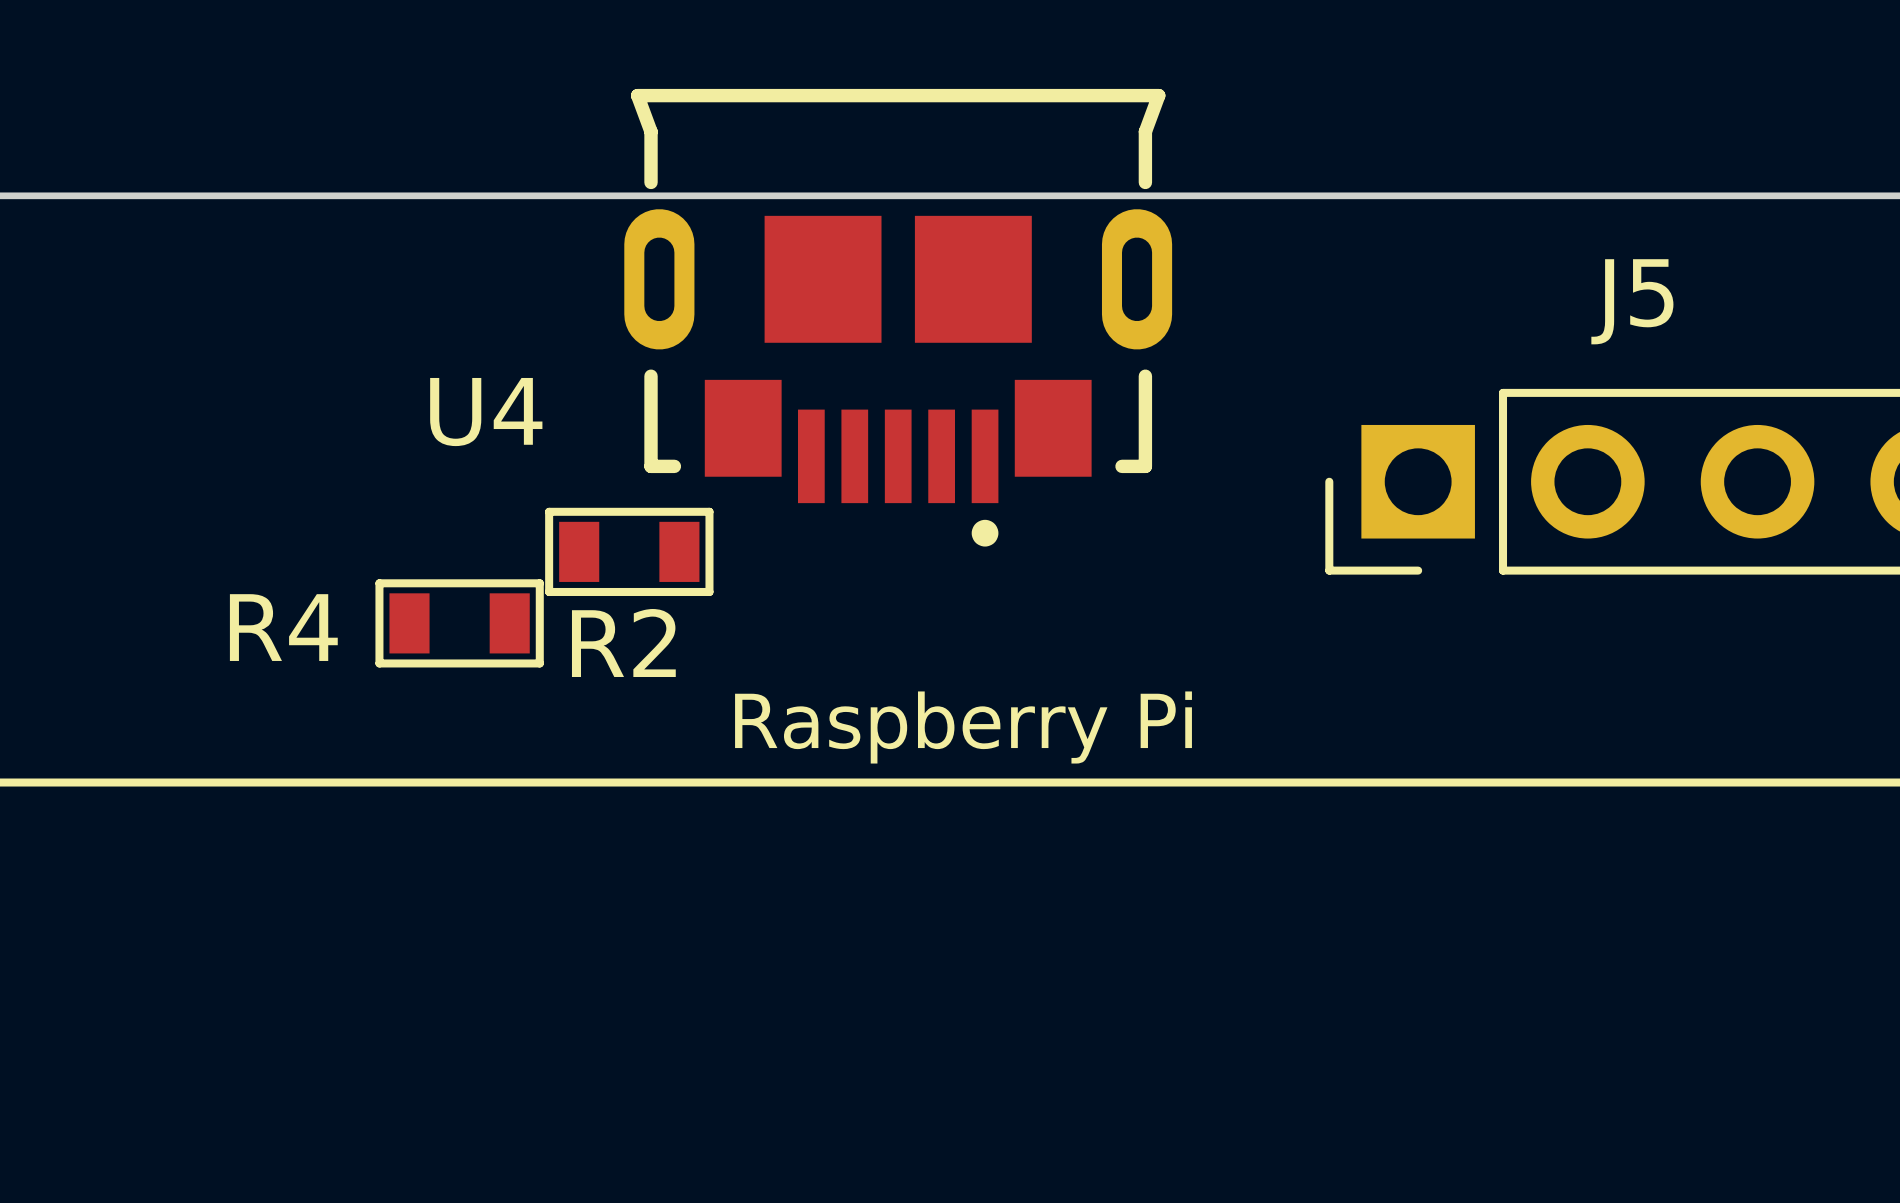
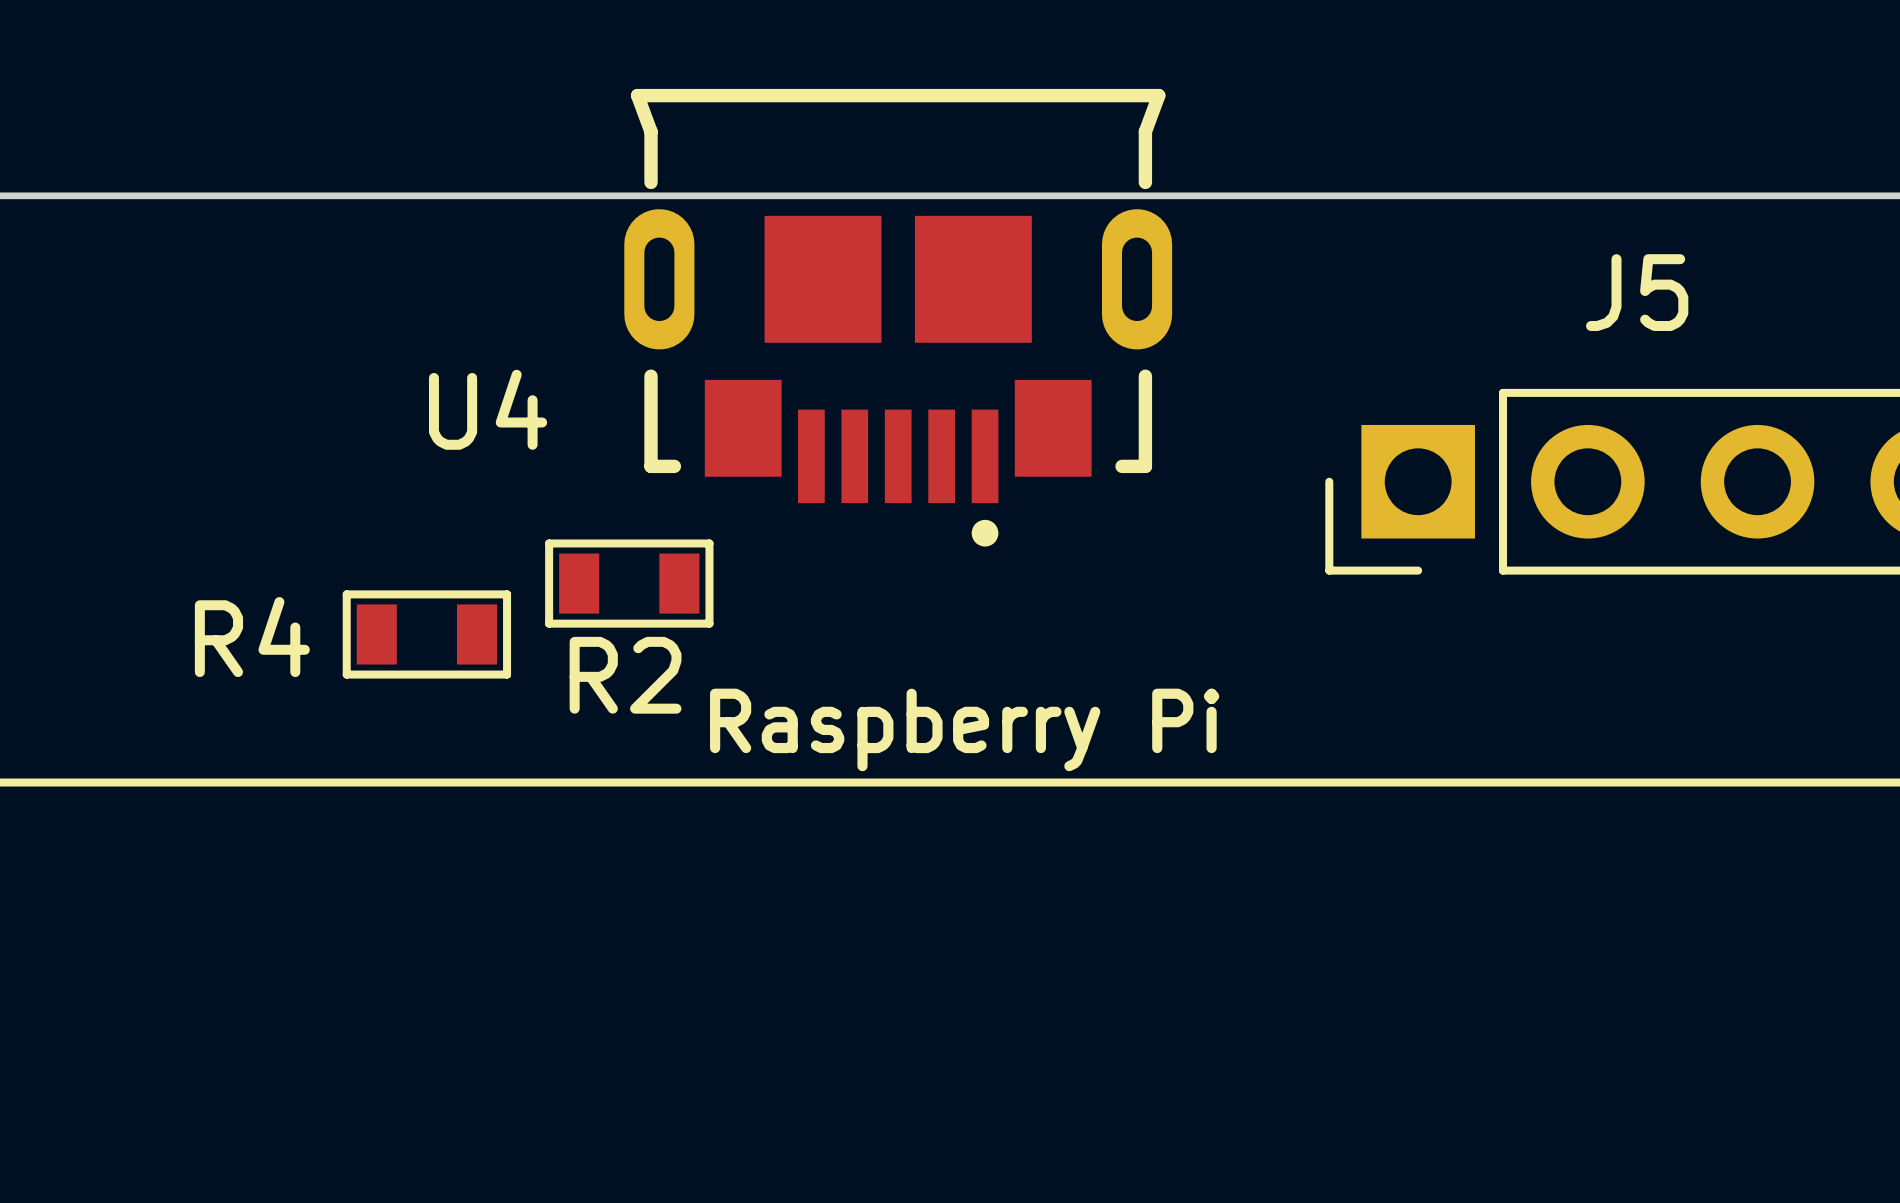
R2 position: (629, 551) -> (629, 583)
R4 position: (459, 623) -> (426, 634)

